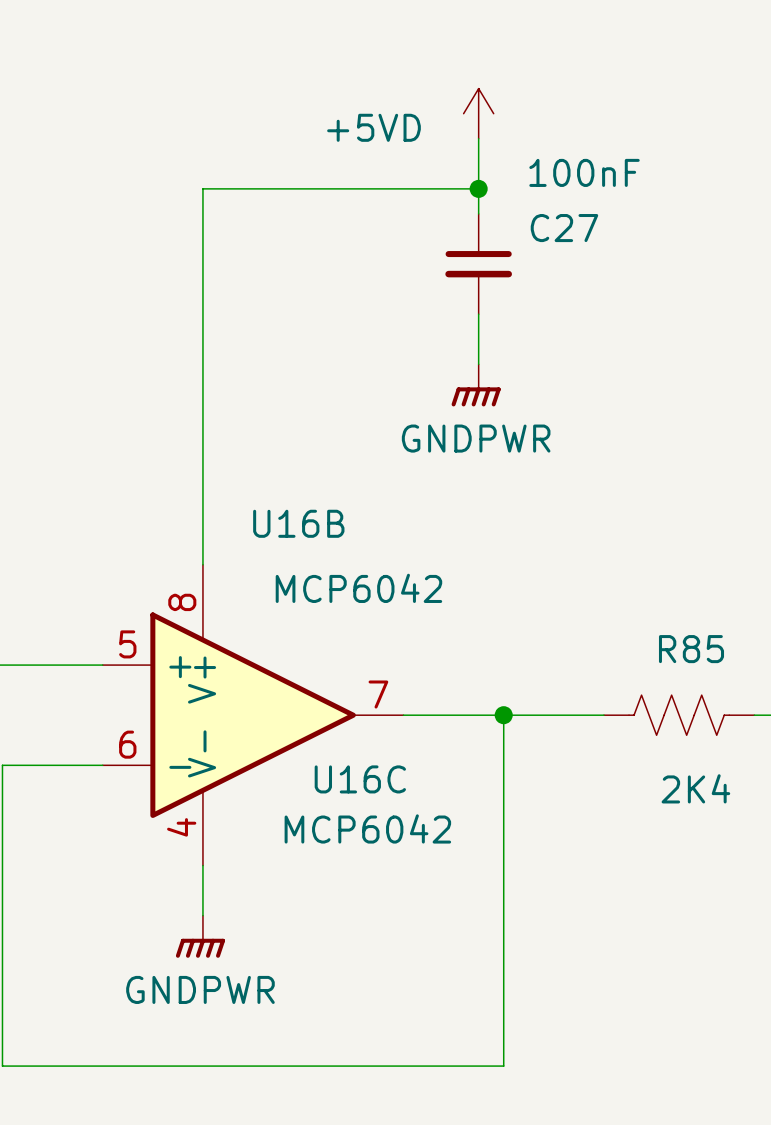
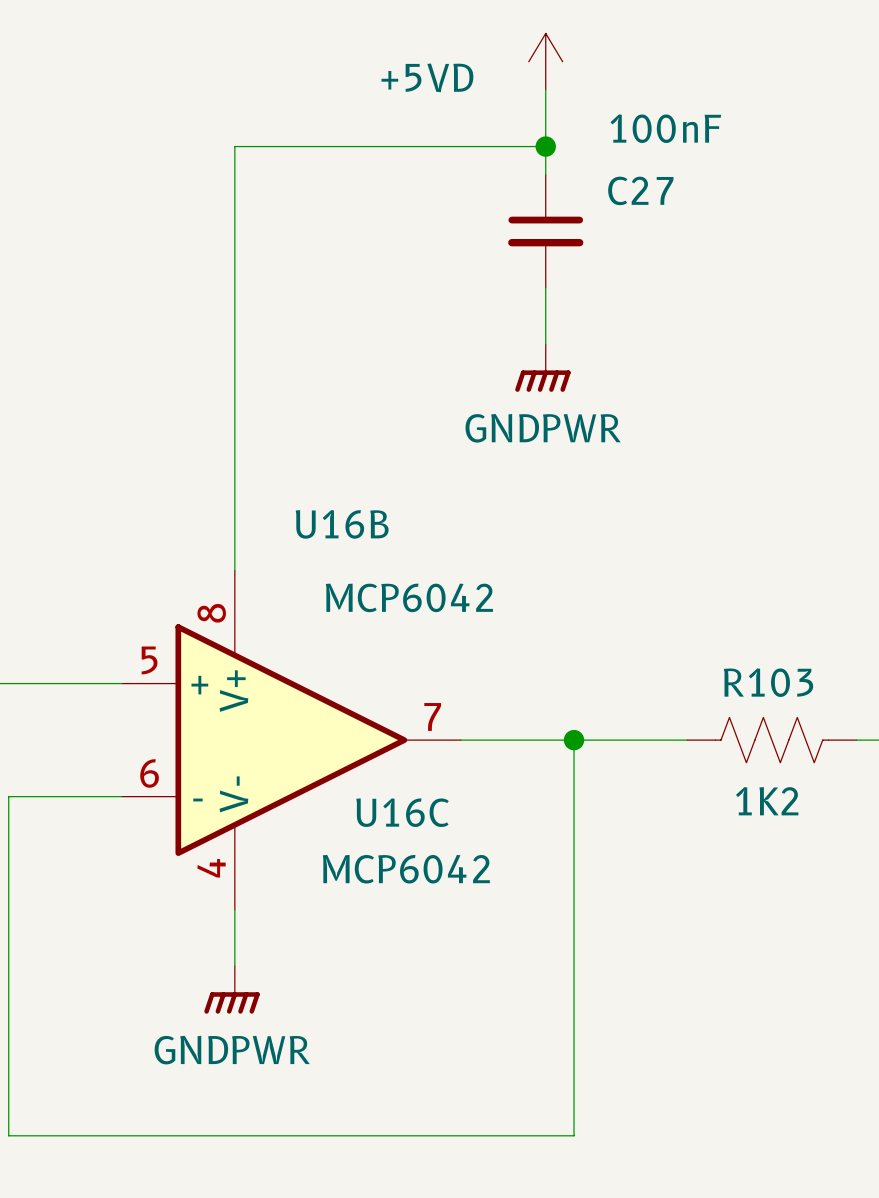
R85 name: R85 (691, 649) -> R103 (768, 682)
R85 value: 2K4 (695, 788) -> 1K2 (767, 801)

